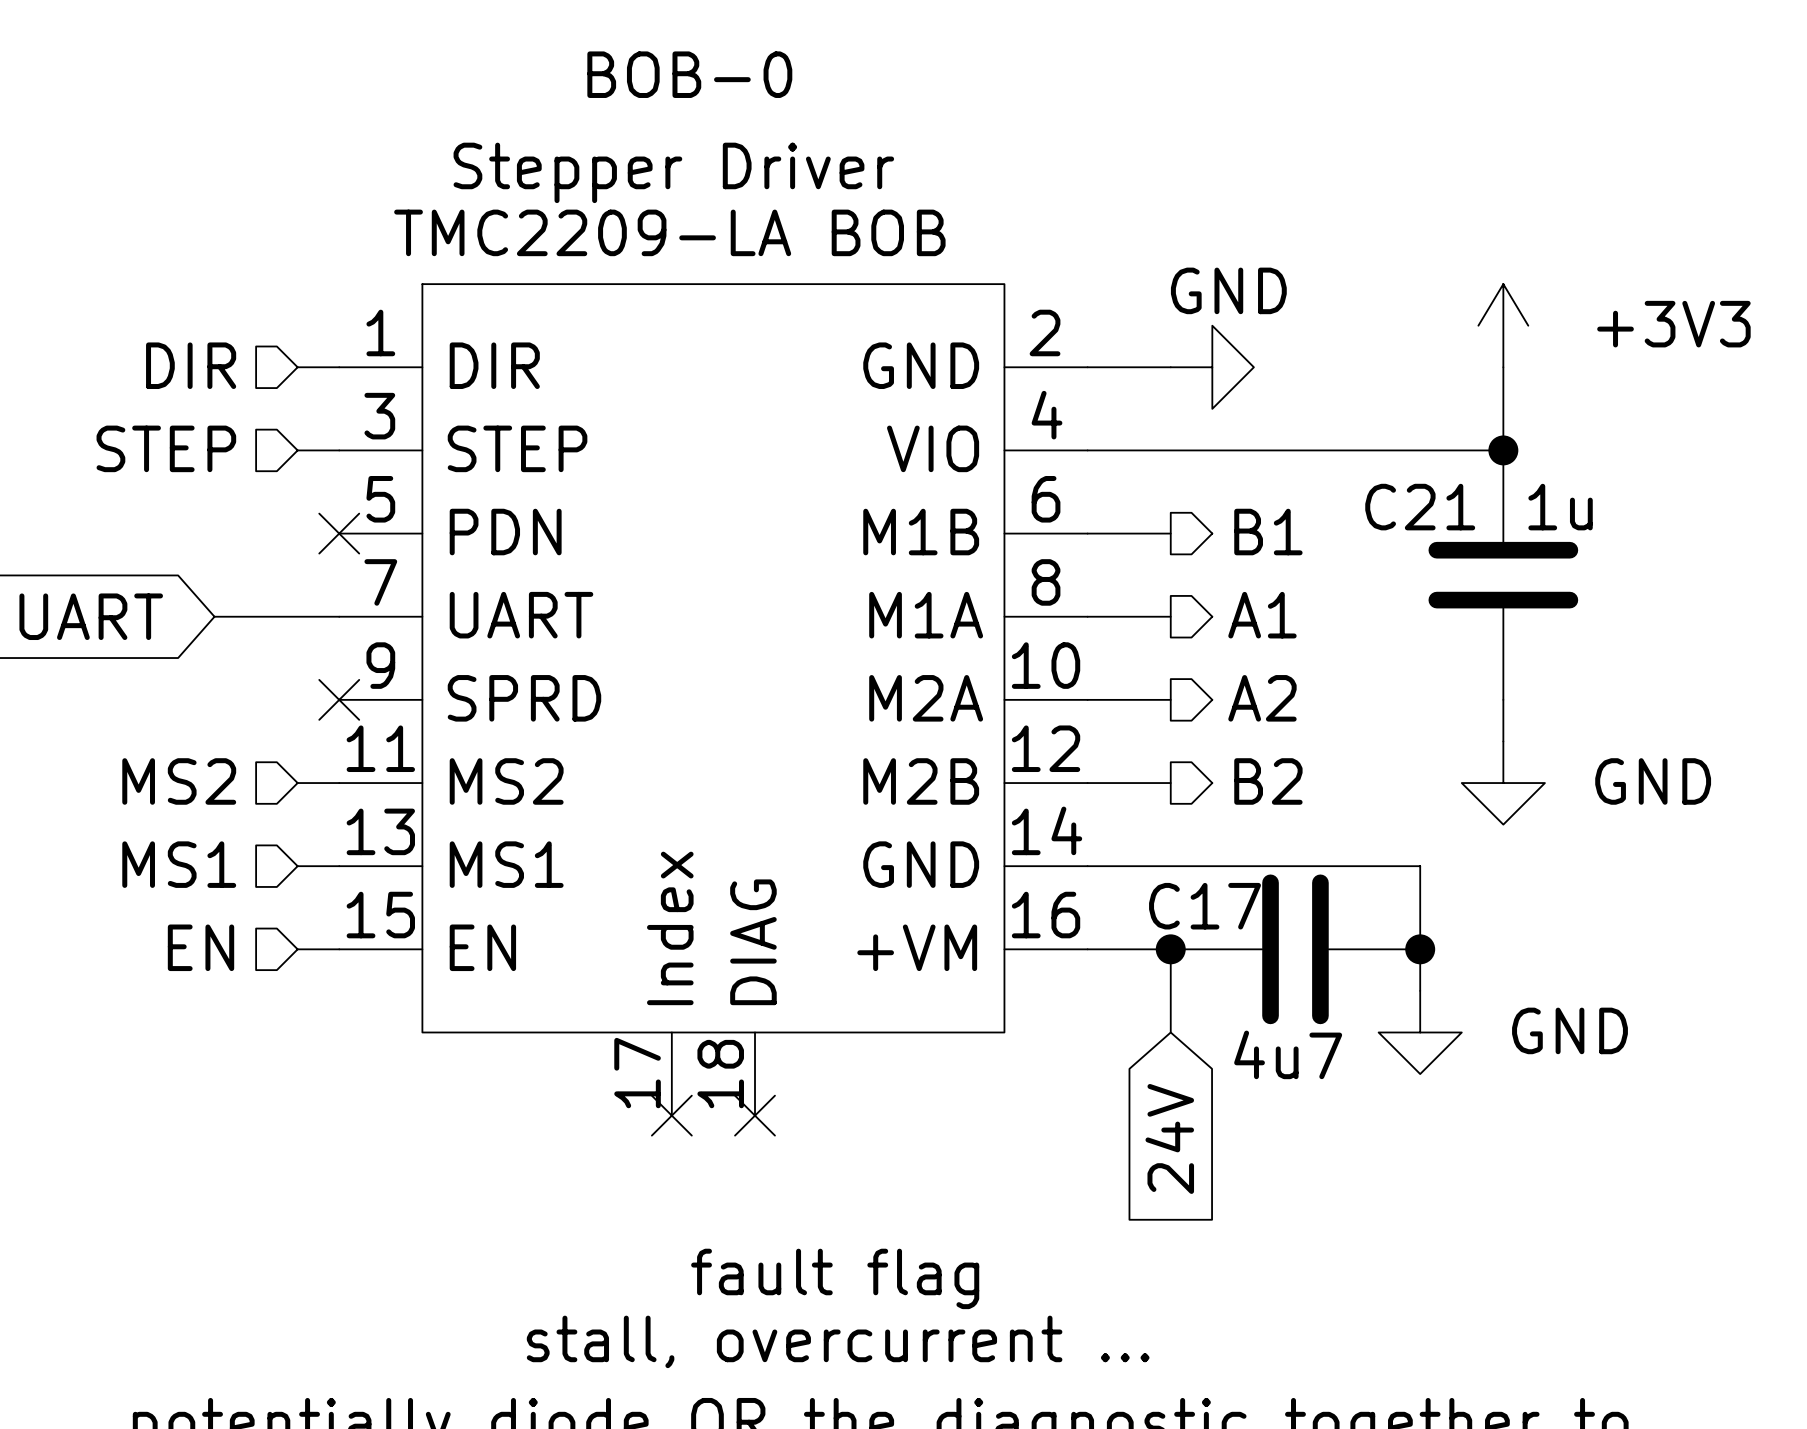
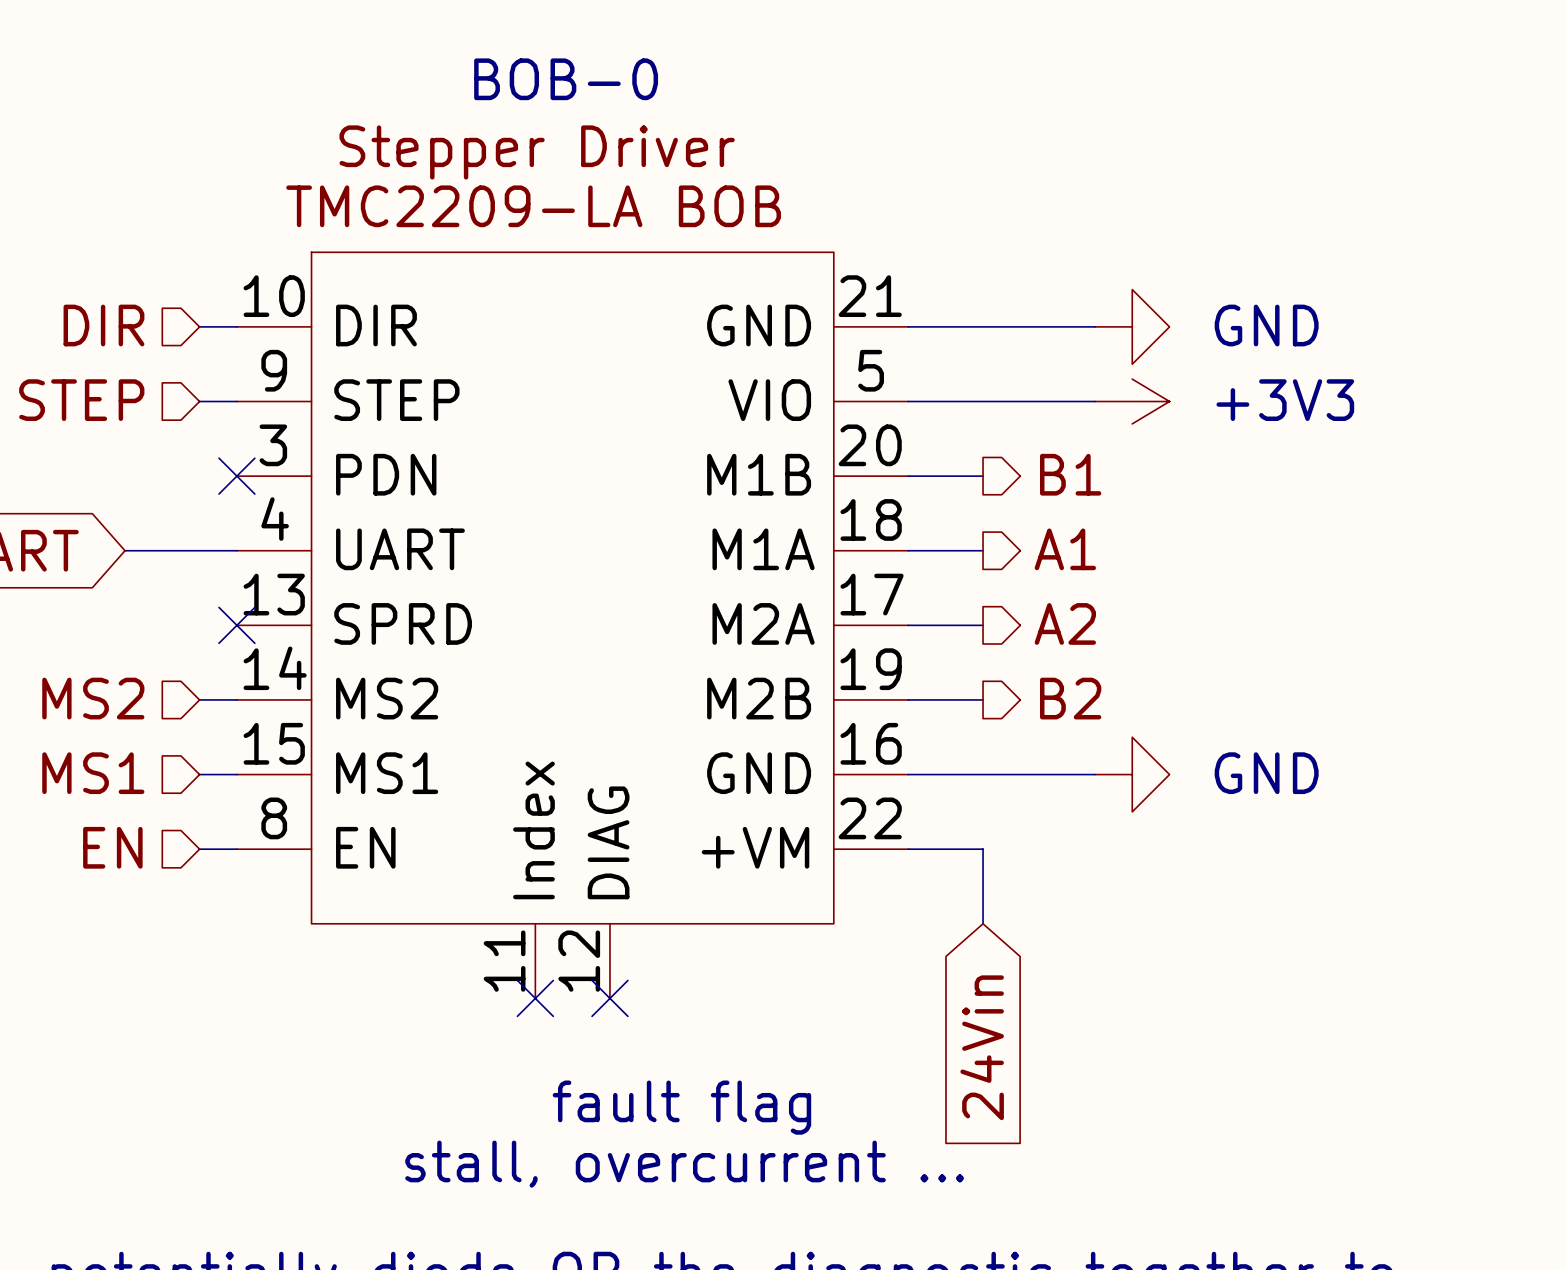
BOB-0 symbol: [339, 284, 1088, 1116] -> [236, 252, 909, 999]
power symbol text position: GND (1228, 290) -> GND (1266, 325)
power symbol rotation: 0° (1503, 325) -> 90° clockwise (1132, 401)
power symbol position: +3V3 (1503, 325) -> +3V3 (1132, 401)
wire: none -> (983, 326) (1094, 326)
power symbol position: GND (1212, 367) -> GND (1132, 326)
wire: (1503, 367) (1503, 450) (1295, 450) -> none
junction: (1503, 450) -> none
C21: 1u (1503, 575) -> none
wire: (1503, 699) (1503, 741) -> none
power symbol: GND (1503, 783) -> none
wire: (1295, 866) (1420, 866) (1420, 990) -> none
power symbol: none -> GND (1132, 774)
junction: (1170, 949) -> none
C17: 4u7 (1295, 949) -> none
junction: (1420, 949) -> none
power symbol: GND (1420, 1032) -> none
global label: 24V (1169, 1138) -> 24Vin (982, 1047)
text position: fault flag (835, 1278) -> fault flag (681, 1107)
text position: stall, overcurrent ... (838, 1341) -> stall, overcurrent ... (684, 1164)

